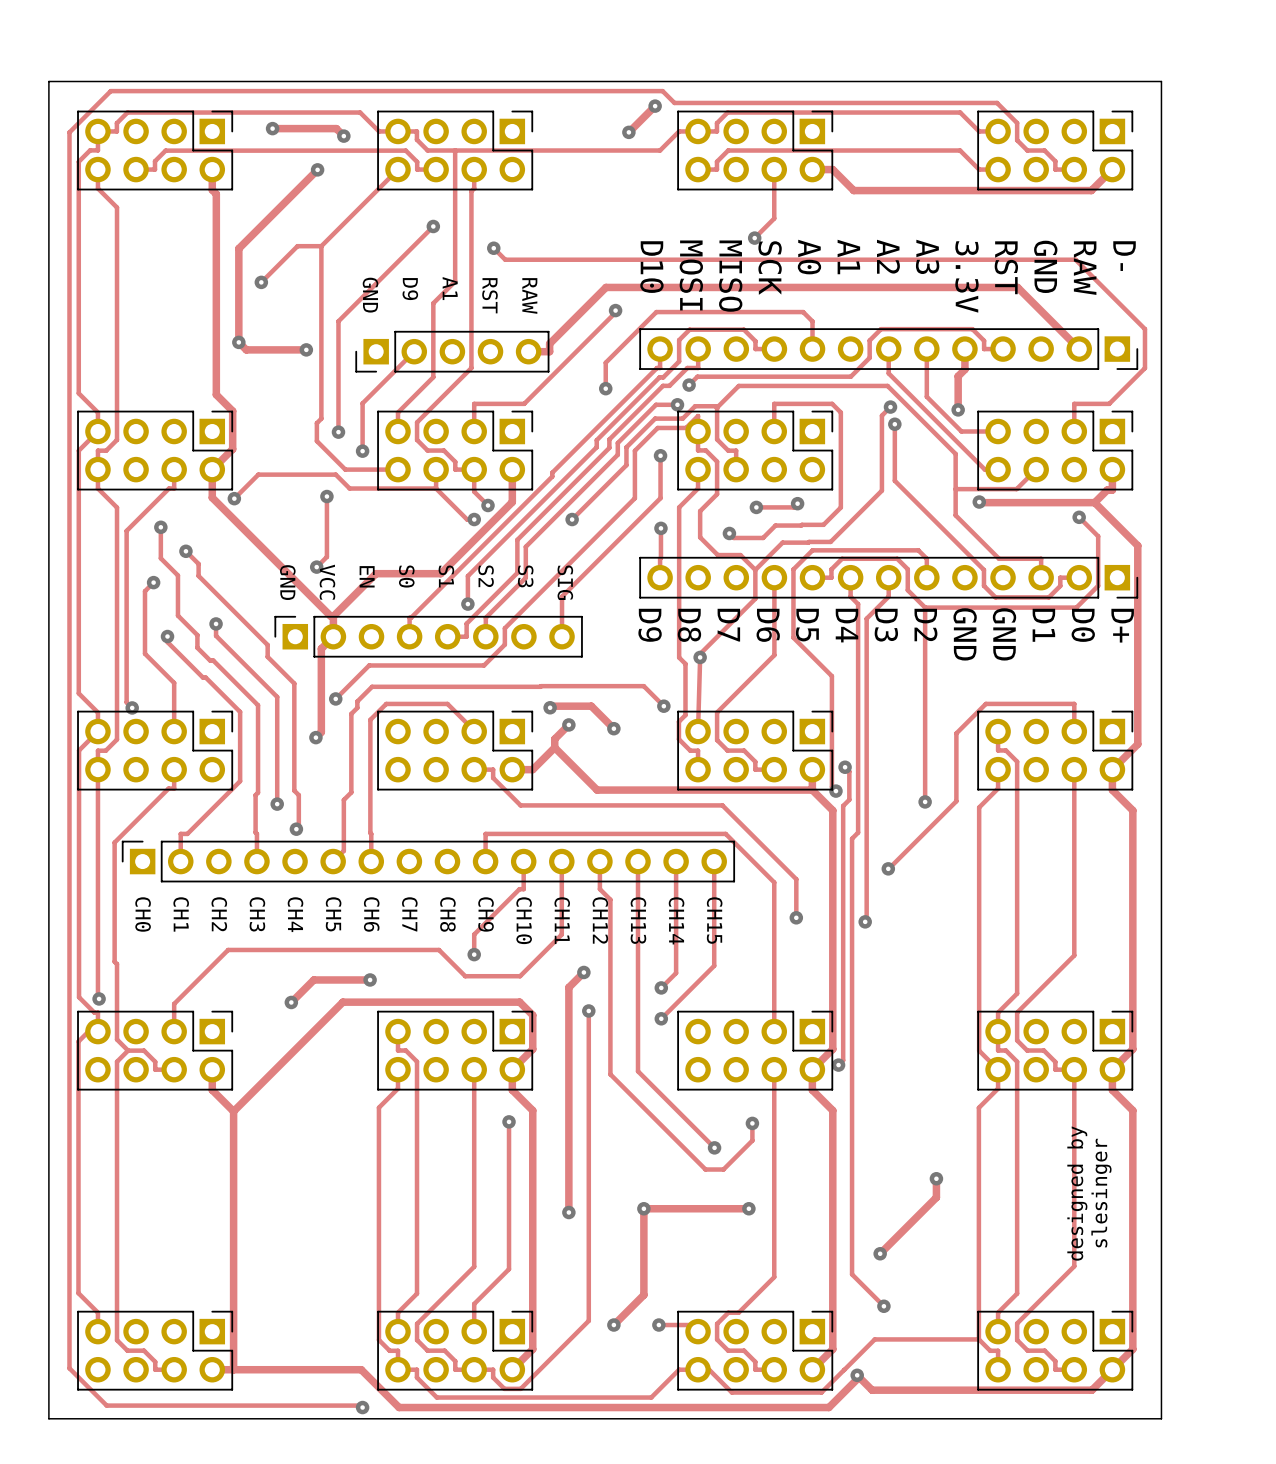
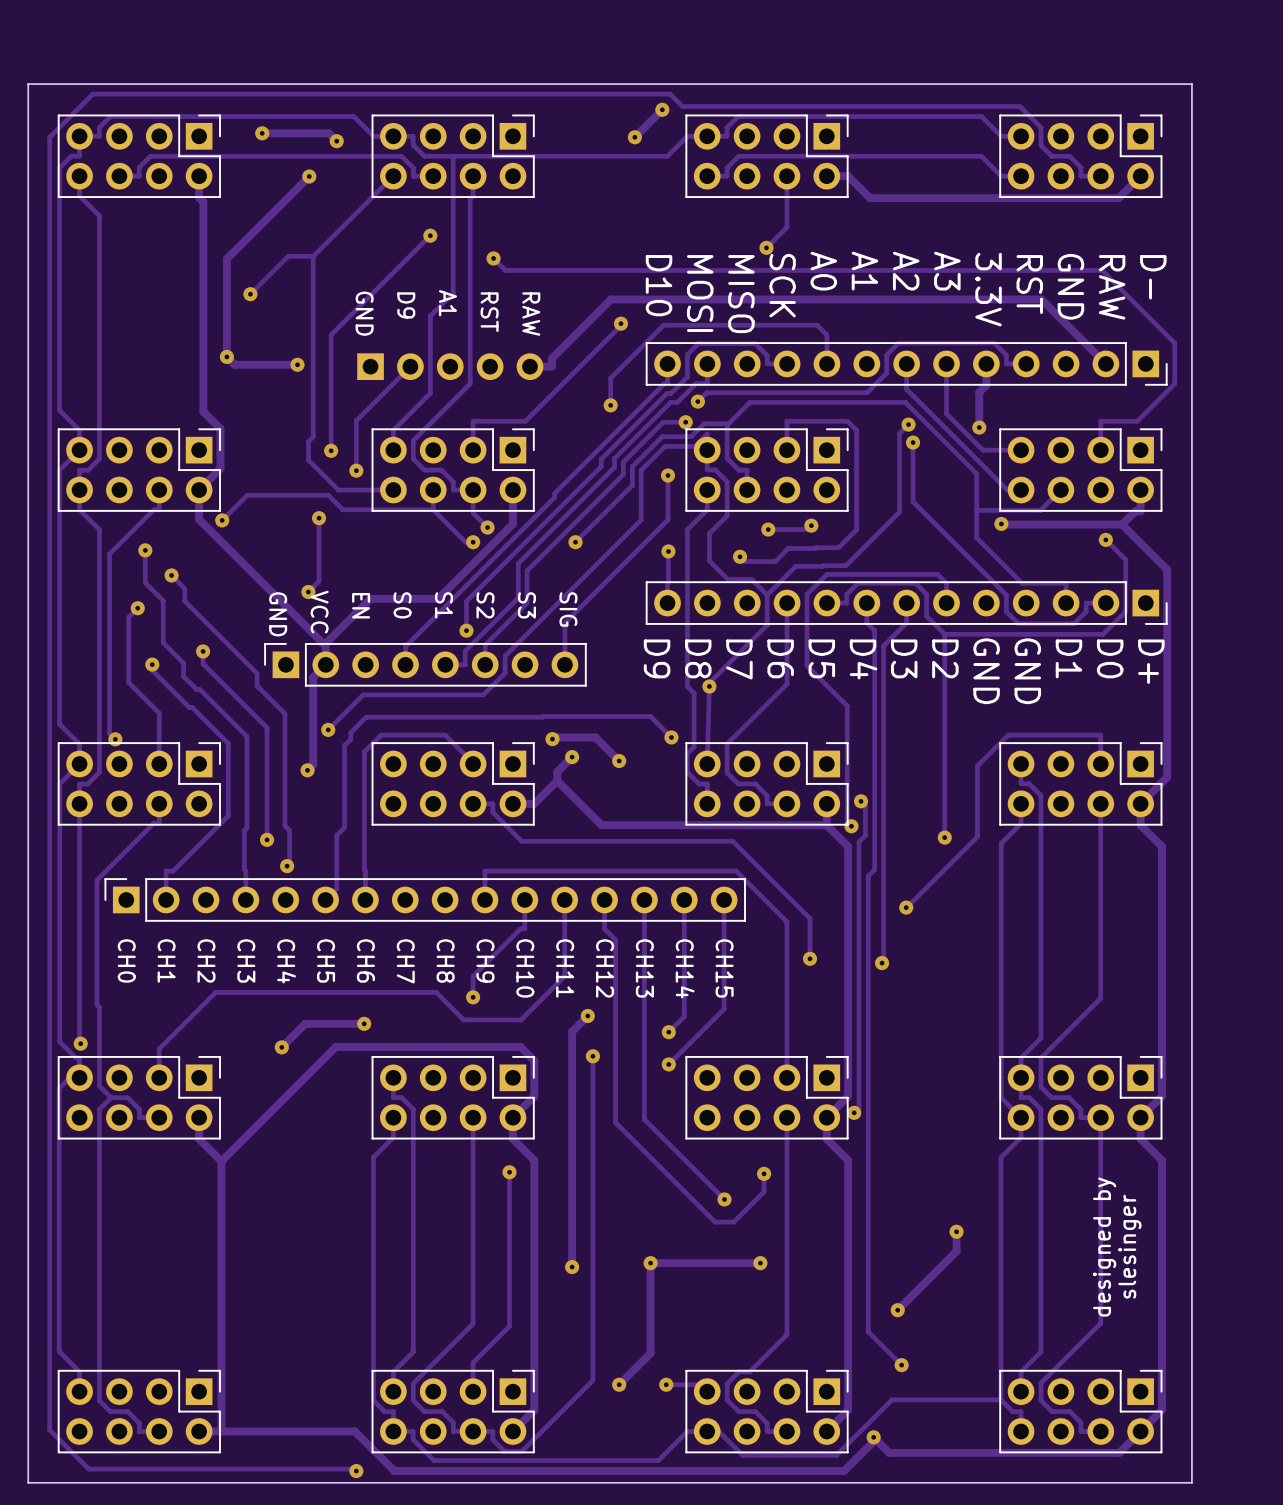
part side: top (452, 351) -> bottom (450, 366)

